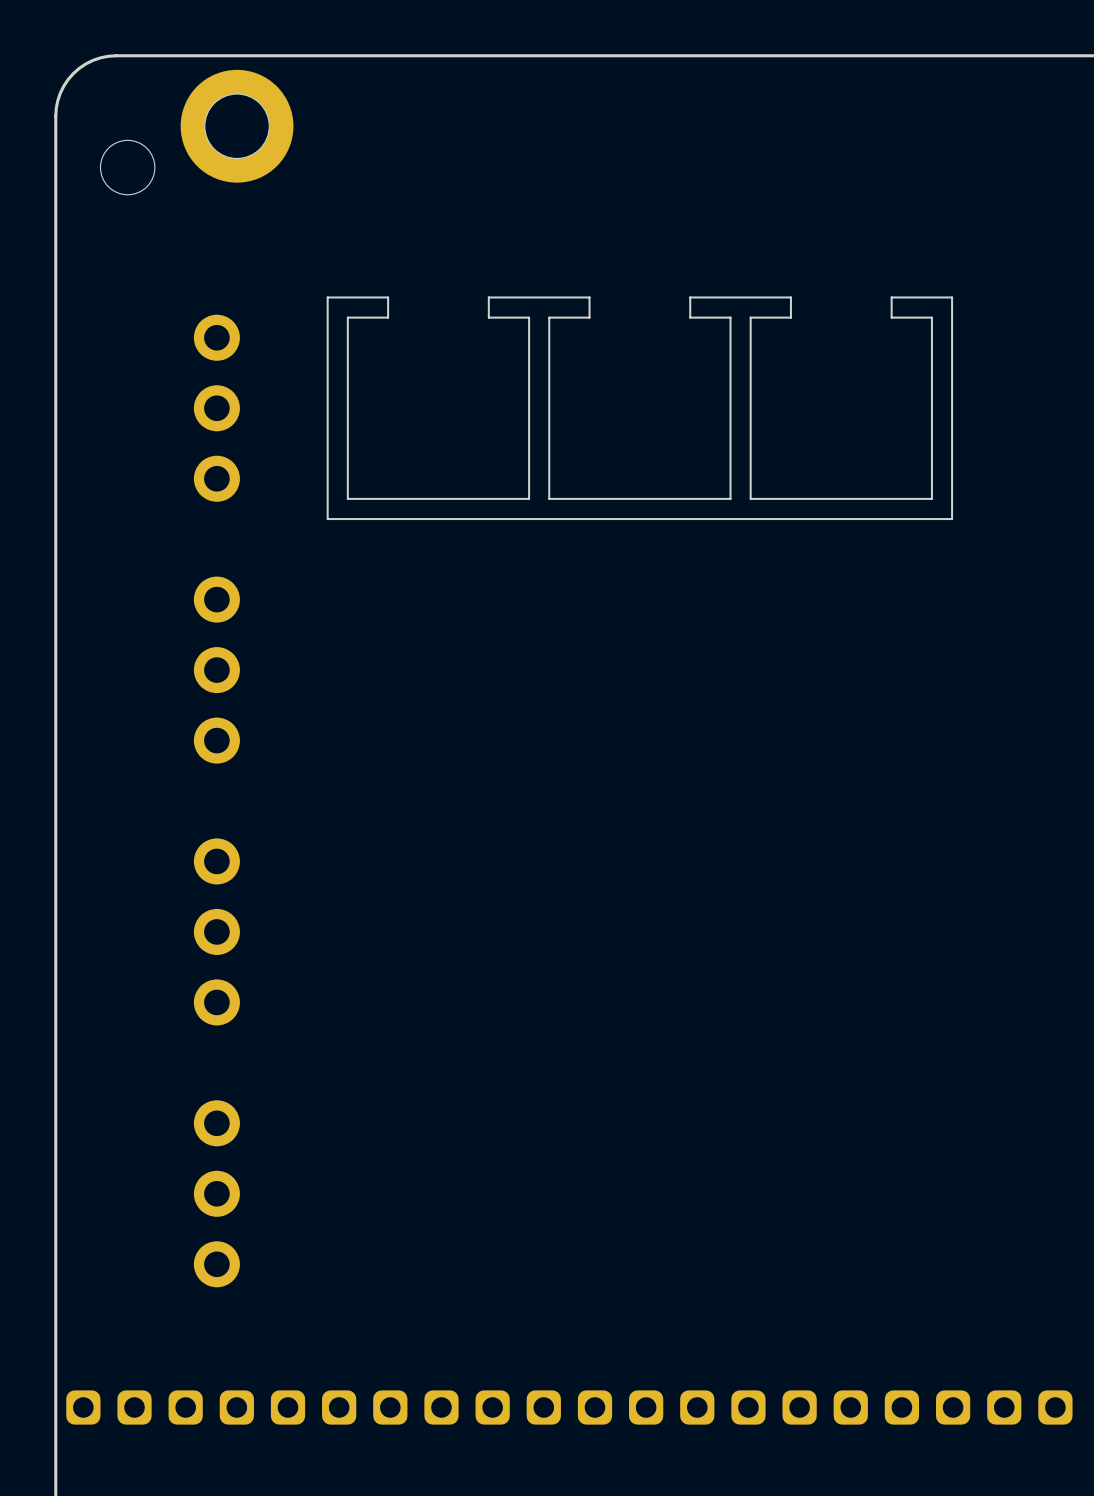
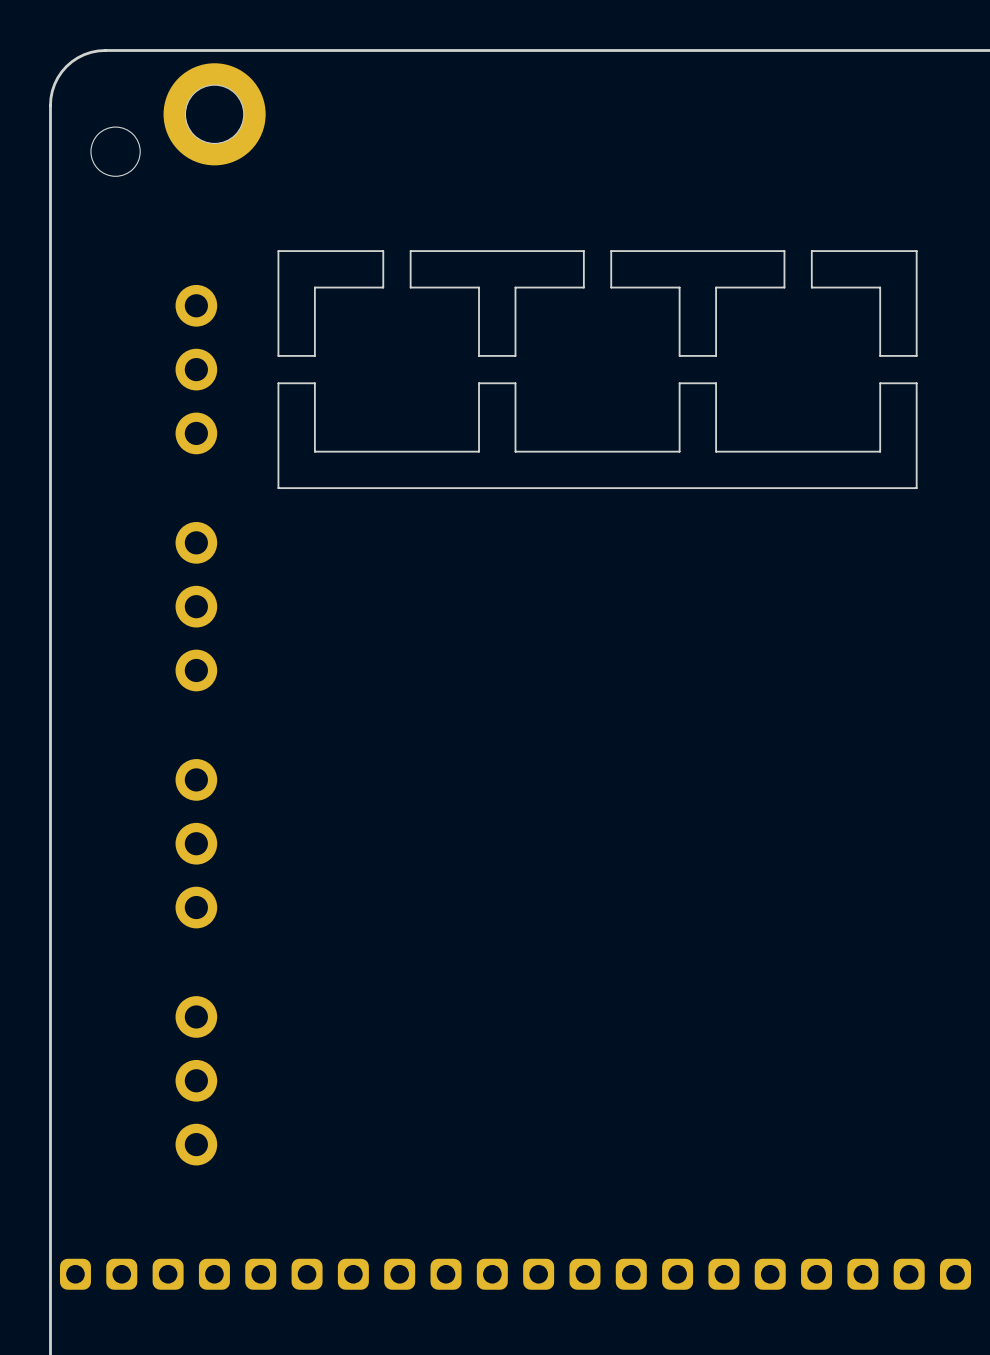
board edge: (569, 317) (549, 317) (549, 498) (569, 498) -> (515, 287) (515, 355) (479, 355)
board edge: (589, 317) (589, 297) (488, 297) (488, 317) -> (533, 287) (583, 287) (583, 251) (410, 251) (410, 287) (442, 287)
board edge: none -> (624, 287) (611, 287) (611, 251) (784, 251) (784, 287) (716, 287) (716, 355) (679, 355)
board edge: (730, 317) (730, 498) -> none
board edge: (750, 317) (790, 317) (790, 297) (690, 297) (690, 317) -> (679, 287) (661, 287)
board edge: (896, 317) (891, 317) (891, 297) (952, 297) (952, 519) (327, 519) (327, 297) (388, 297) (388, 317) -> none
board edge: (931, 317) (931, 498) -> (843, 287) (880, 287) (880, 355) (916, 355) (916, 251) (811, 251) (811, 287)
board edge: (347, 393) (347, 423) -> (314, 355) (278, 355) (278, 251) (383, 251) (383, 287) (351, 287)
board edge: (529, 393) (529, 423) -> (515, 451) (515, 383) (479, 383)
board edge: (750, 393) (750, 423) -> (716, 451) (716, 383) (679, 383)
board edge: none -> (314, 383) (278, 383) (278, 488) (916, 488) (916, 383) (880, 383) (880, 451) (843, 451)
board edge: (790, 498) (750, 498) -> (661, 451) (679, 451)

